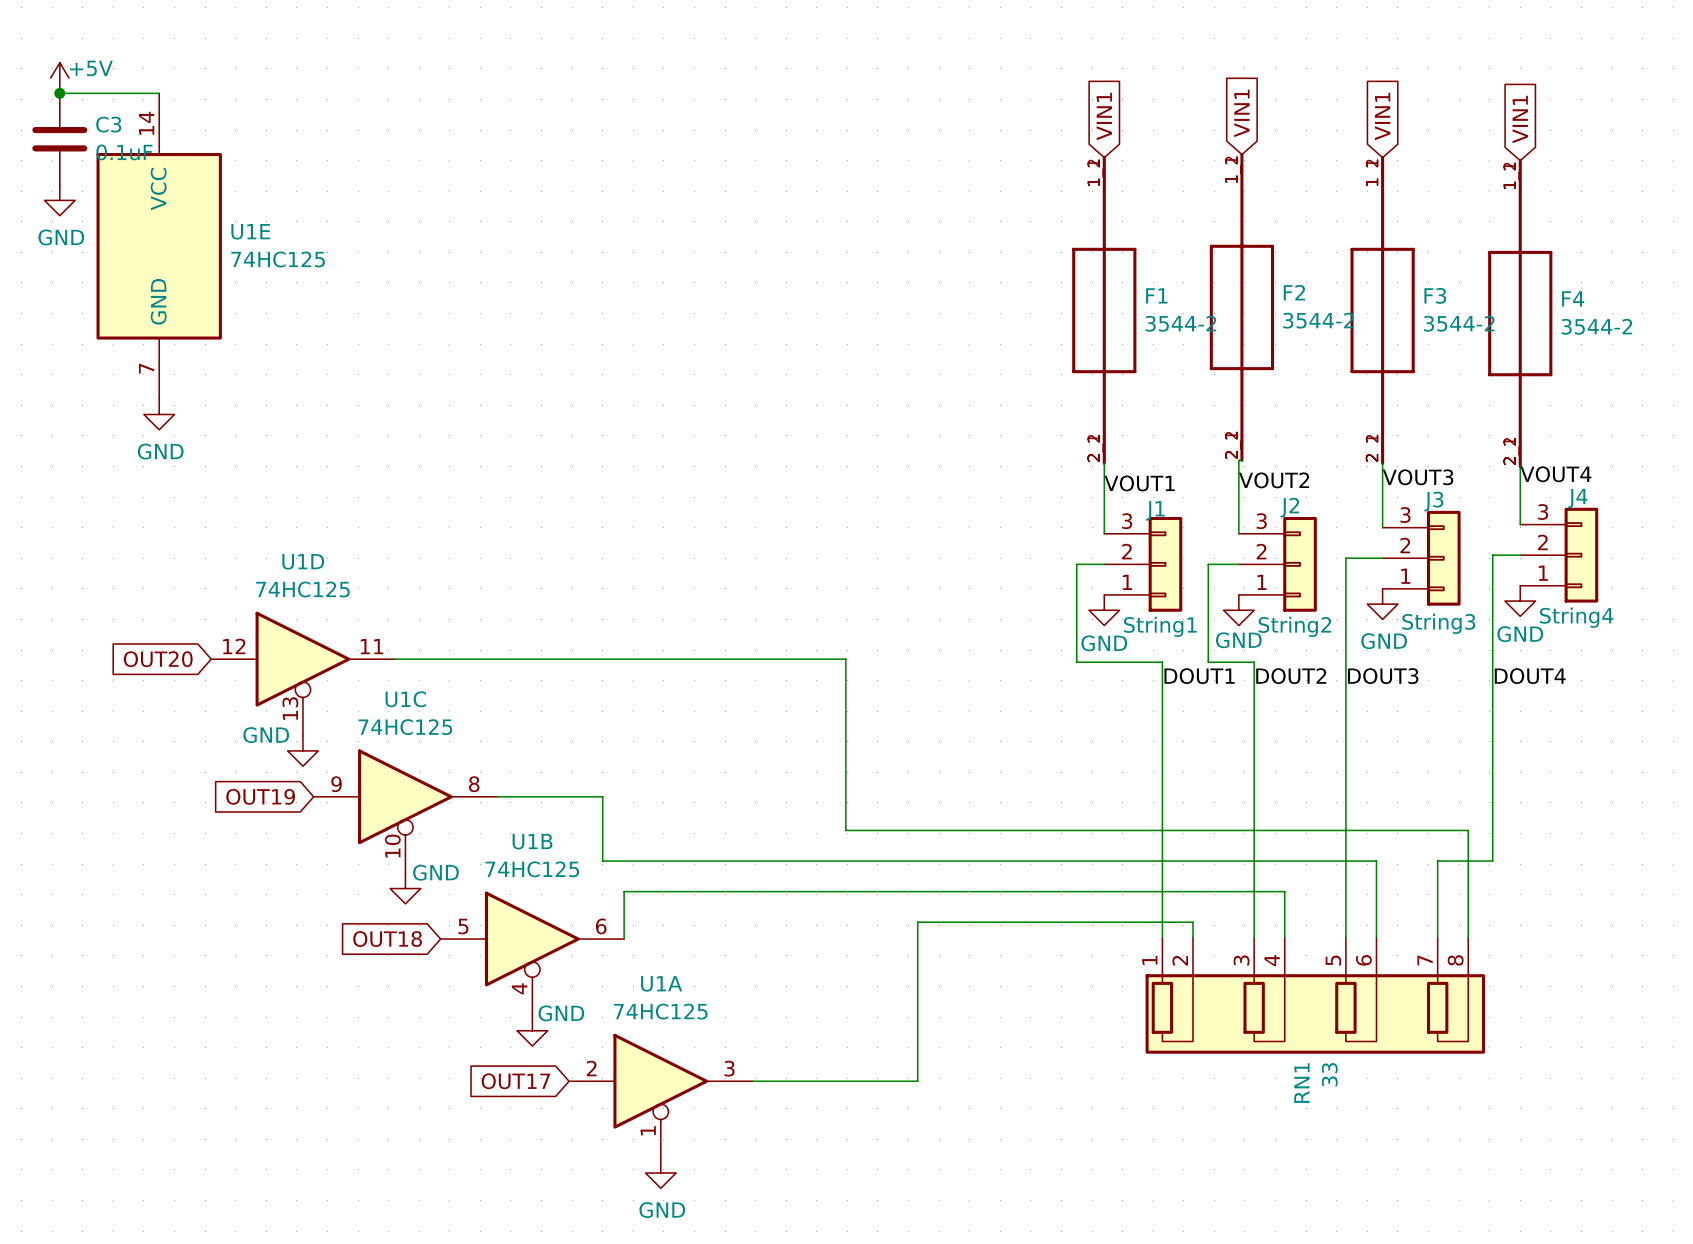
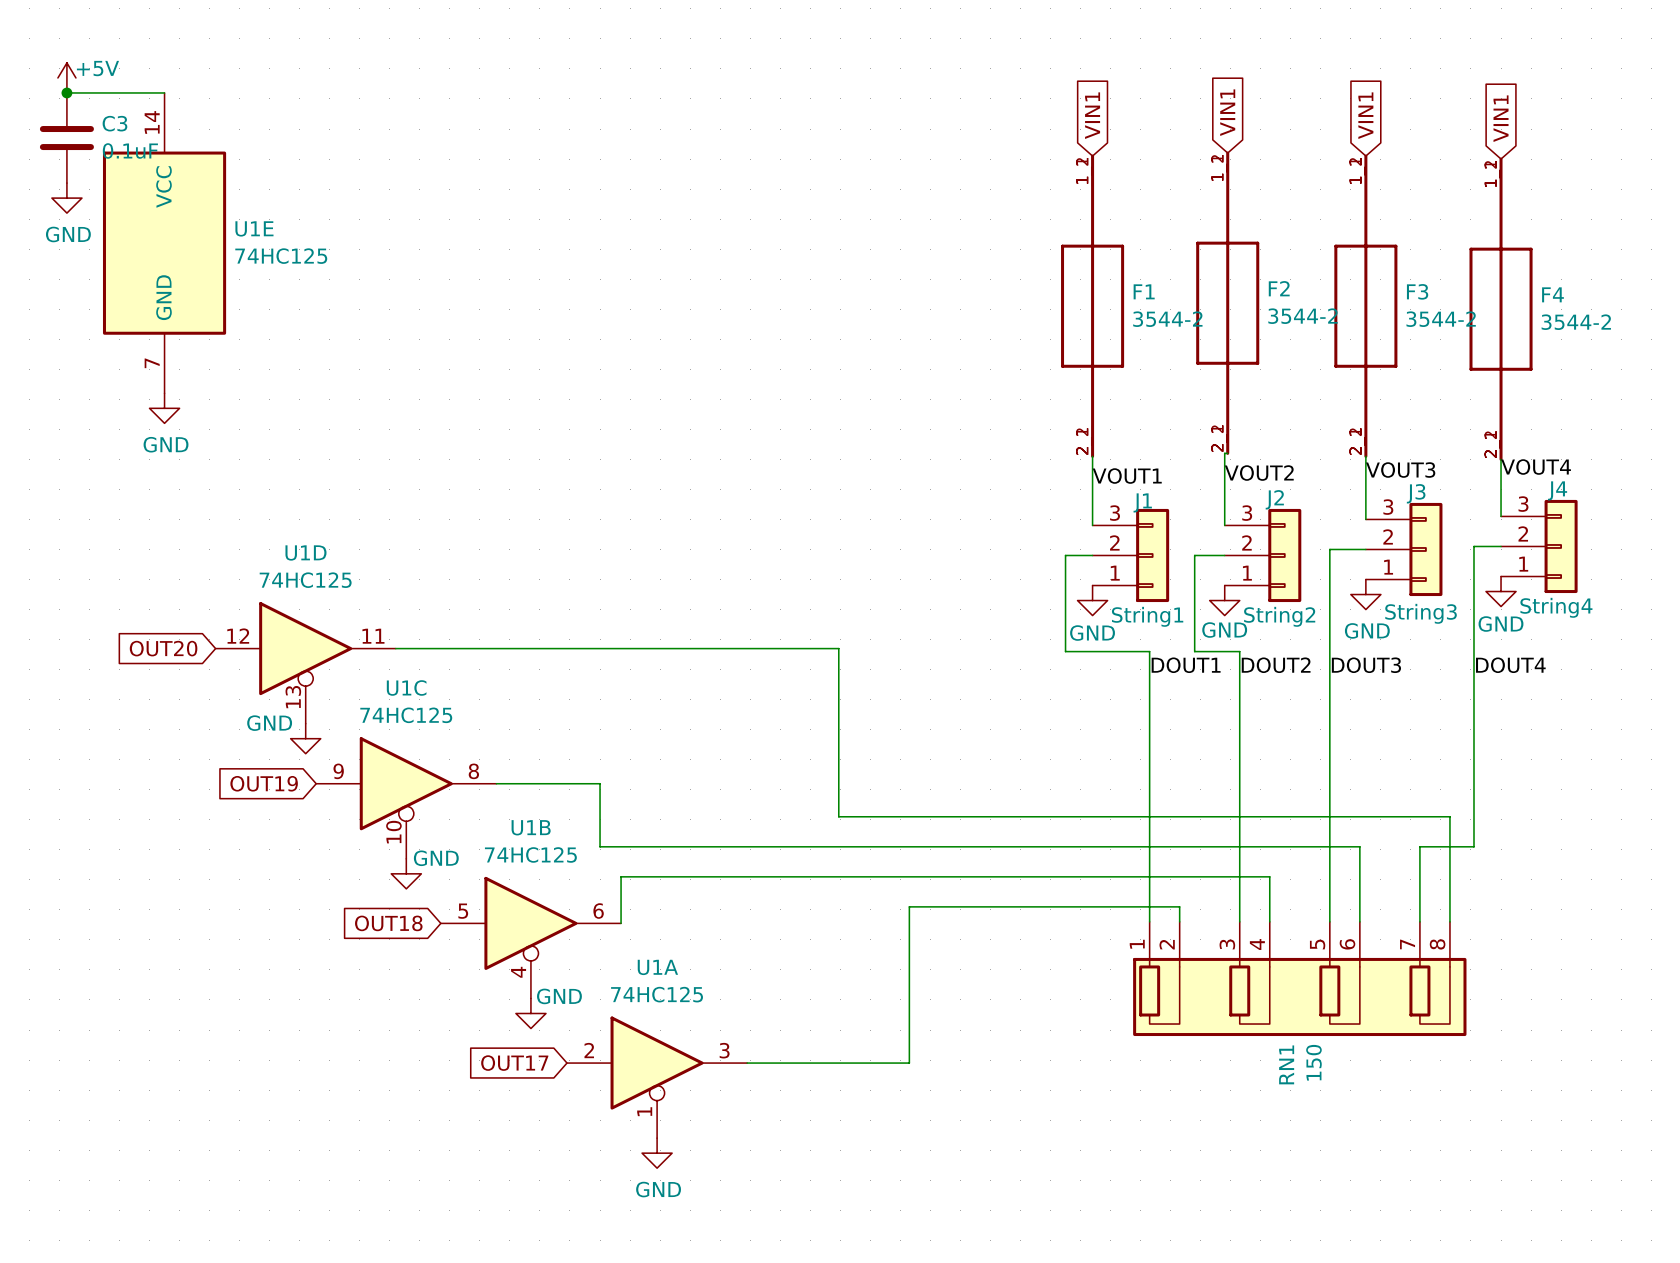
RN1 value: 33 (1329, 1074) -> 150 (1313, 1062)

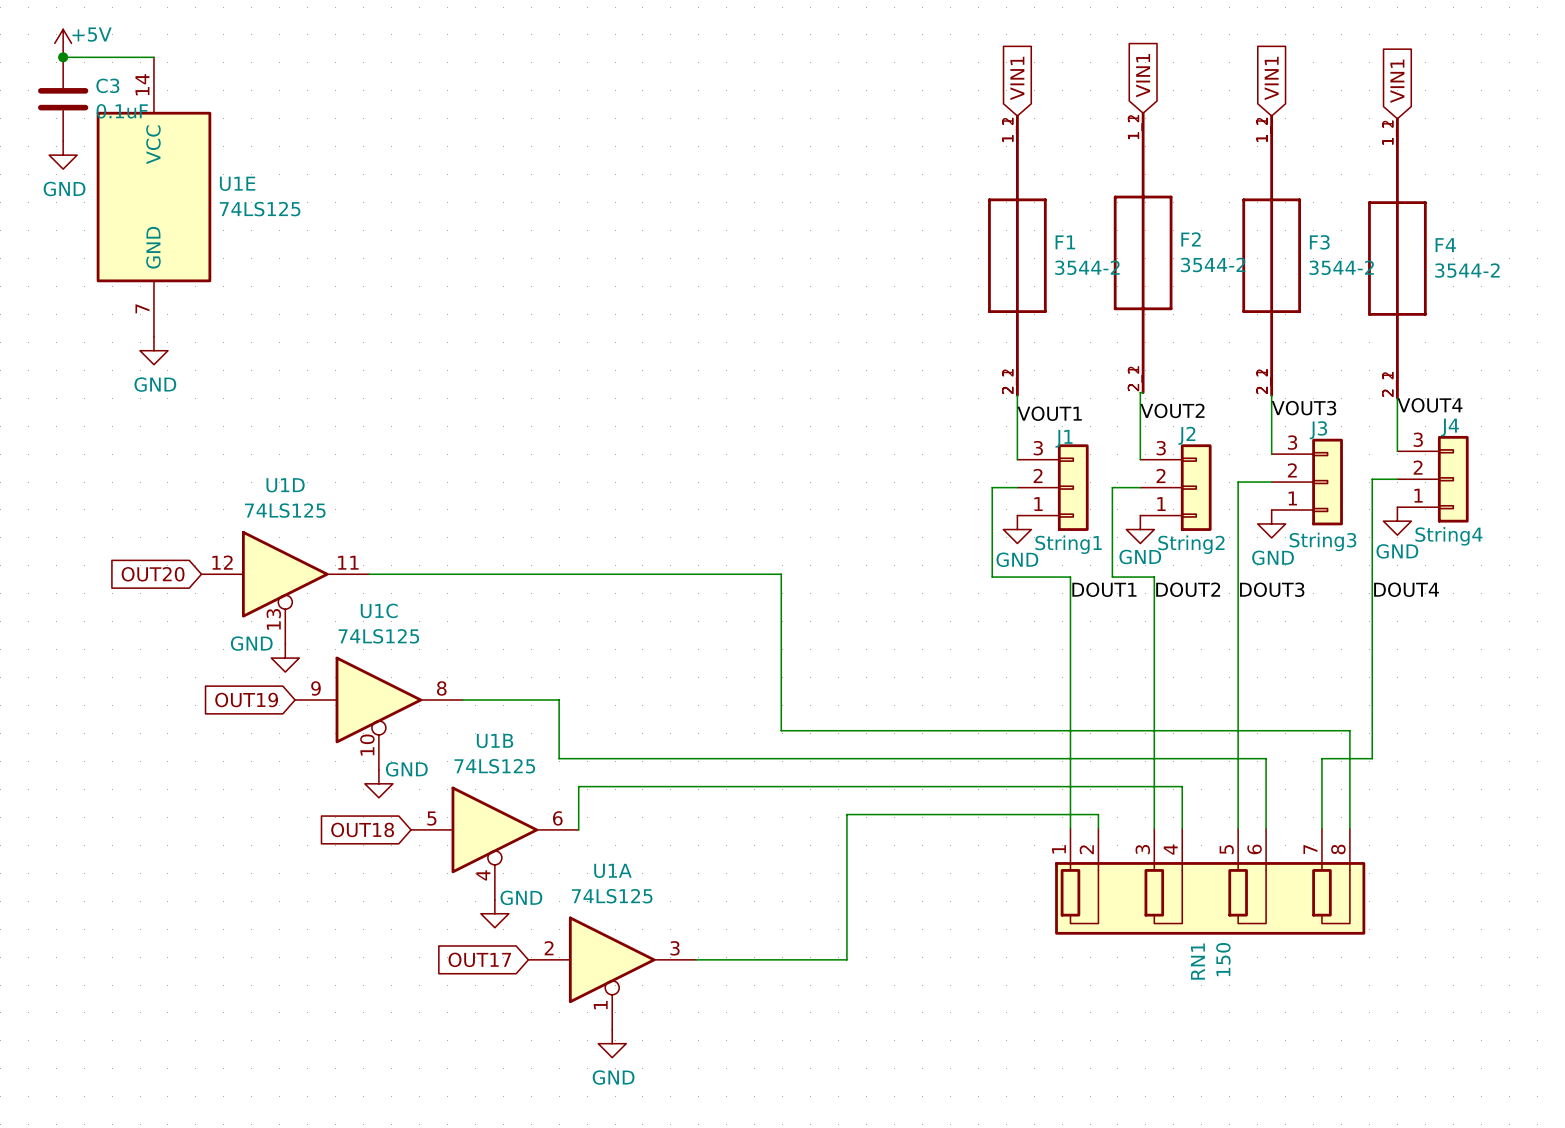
U1E value: 74HC125 (281, 256) -> 74LS125 (260, 209)
U1D value: 74HC125 (305, 580) -> 74LS125 (285, 510)
U1C value: 74HC125 (406, 715) -> 74LS125 (378, 636)
U1B value: 74HC125 (530, 854) -> 74LS125 (494, 766)
U1A value: 74HC125 (657, 994) -> 74LS125 (612, 896)

